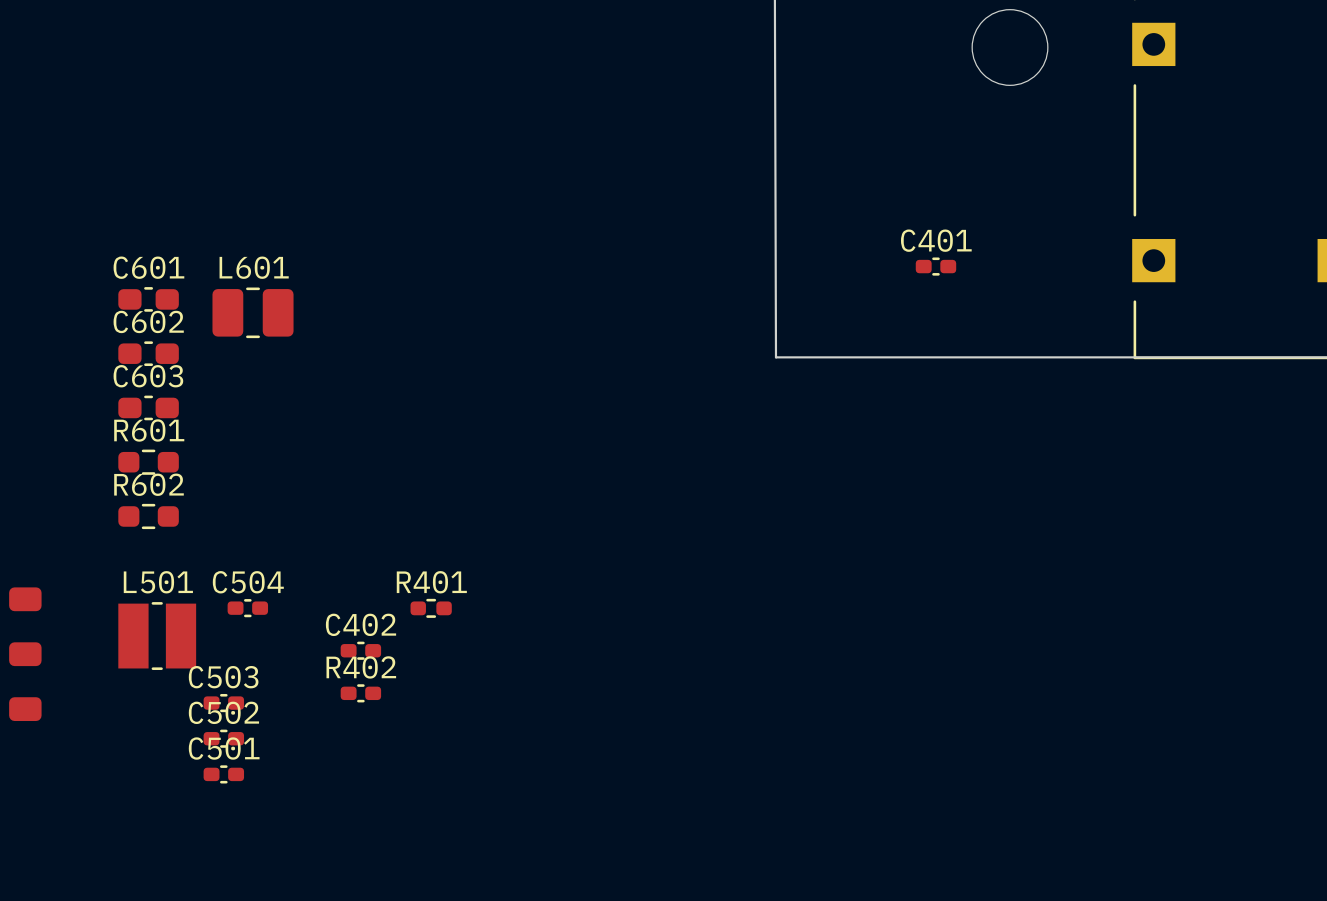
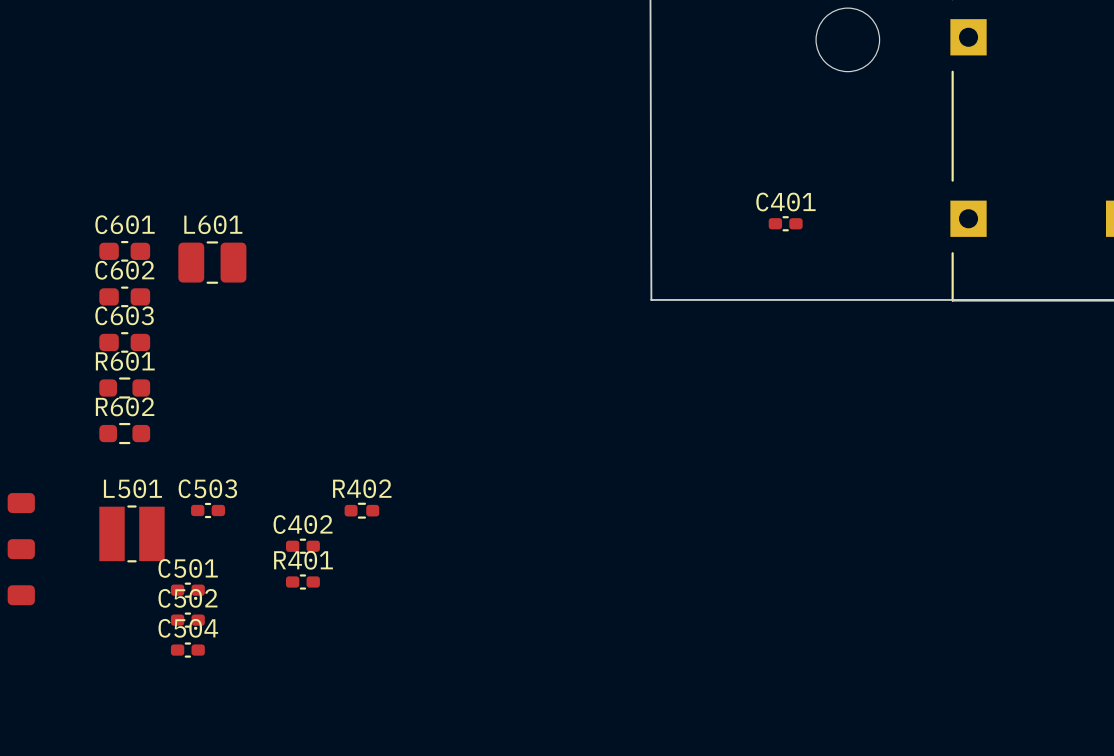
C504 name: C504 (248, 582) -> C503 (207, 488)
R401 name: R401 (431, 582) -> R402 (362, 488)
R402 name: R402 (361, 667) -> R401 (303, 560)
C503 name: C503 (223, 677) -> C501 (188, 568)
C501 name: C501 (224, 748) -> C504 (188, 628)

